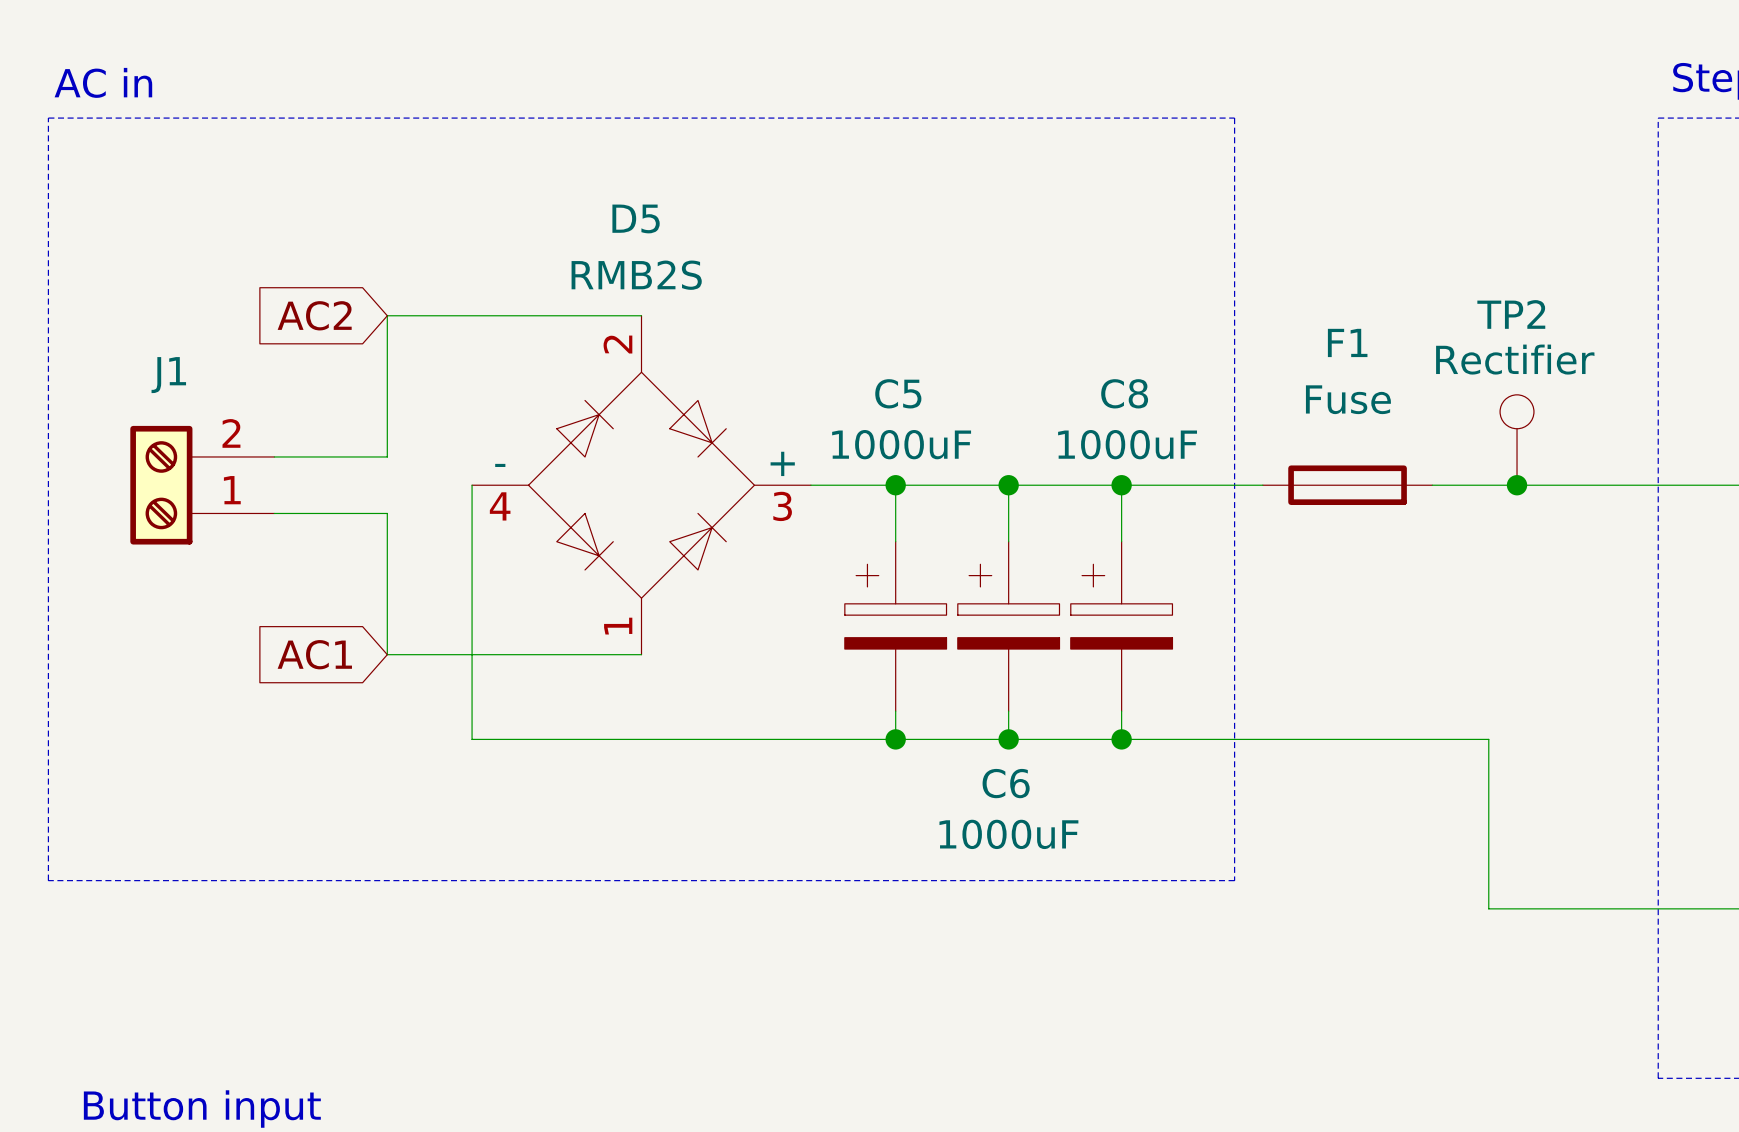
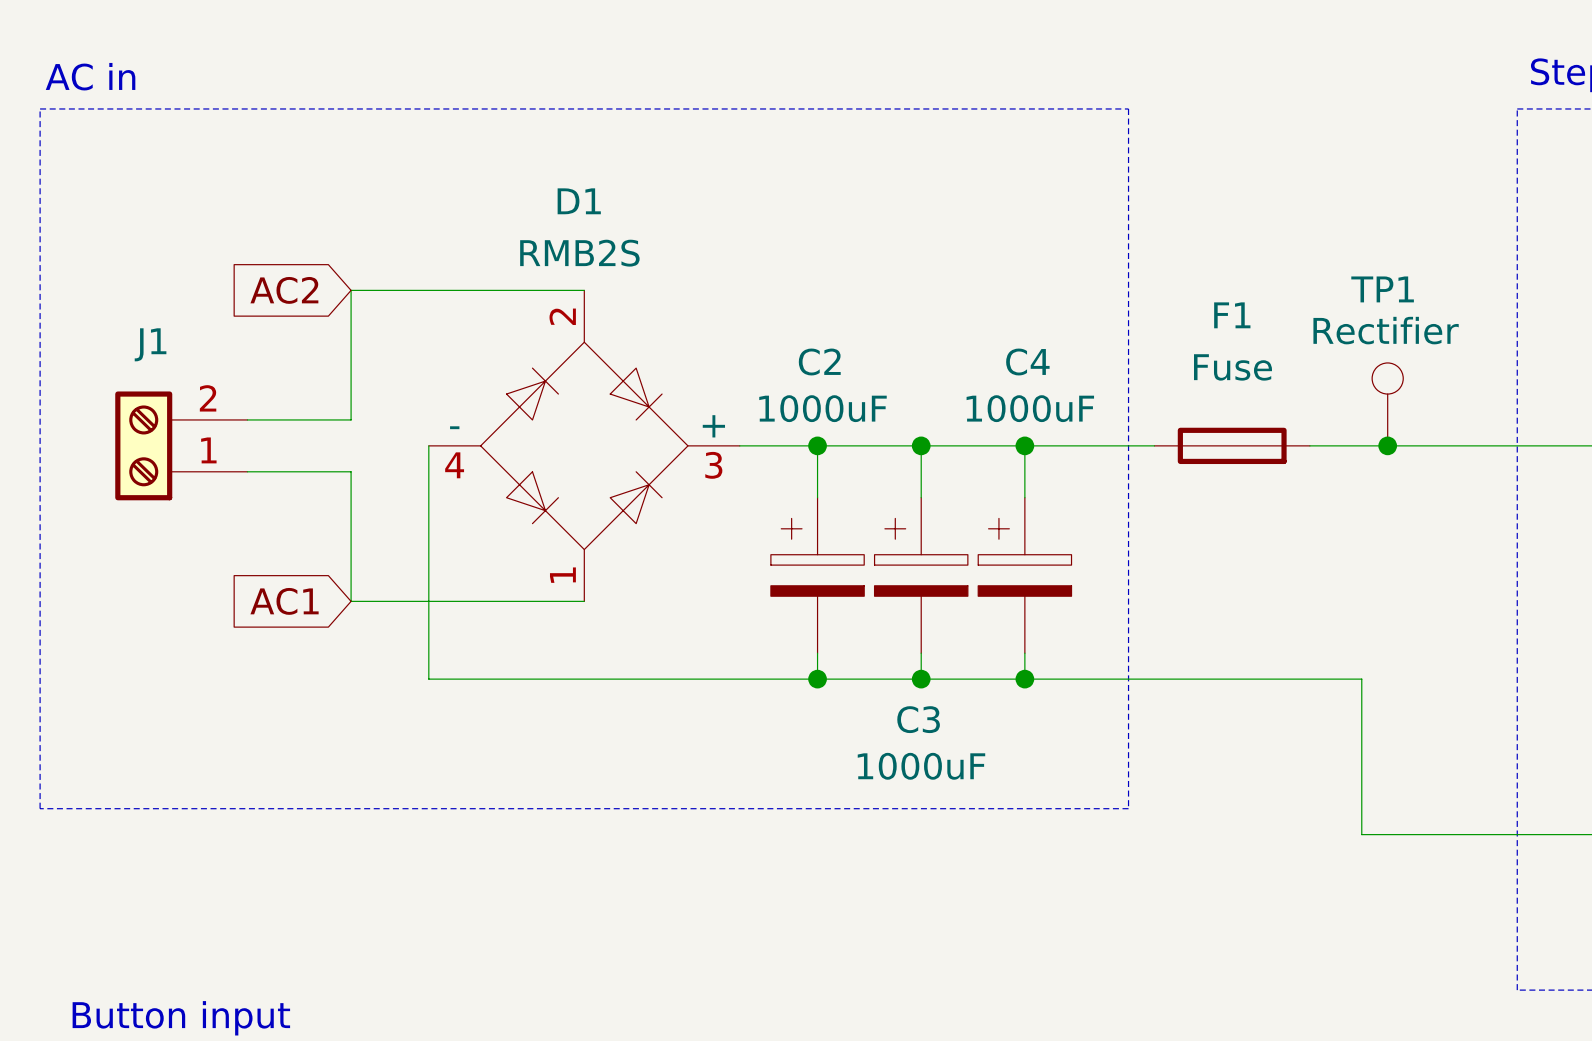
D5 name: D5 (636, 218) -> D1 (579, 201)
TP2 name: TP2 (1511, 314) -> TP1 (1382, 289)
C5 name: C5 (898, 393) -> C2 (819, 362)
C8 name: C8 (1124, 393) -> C4 (1027, 362)
C6 name: C6 (1006, 783) -> C3 (918, 719)

